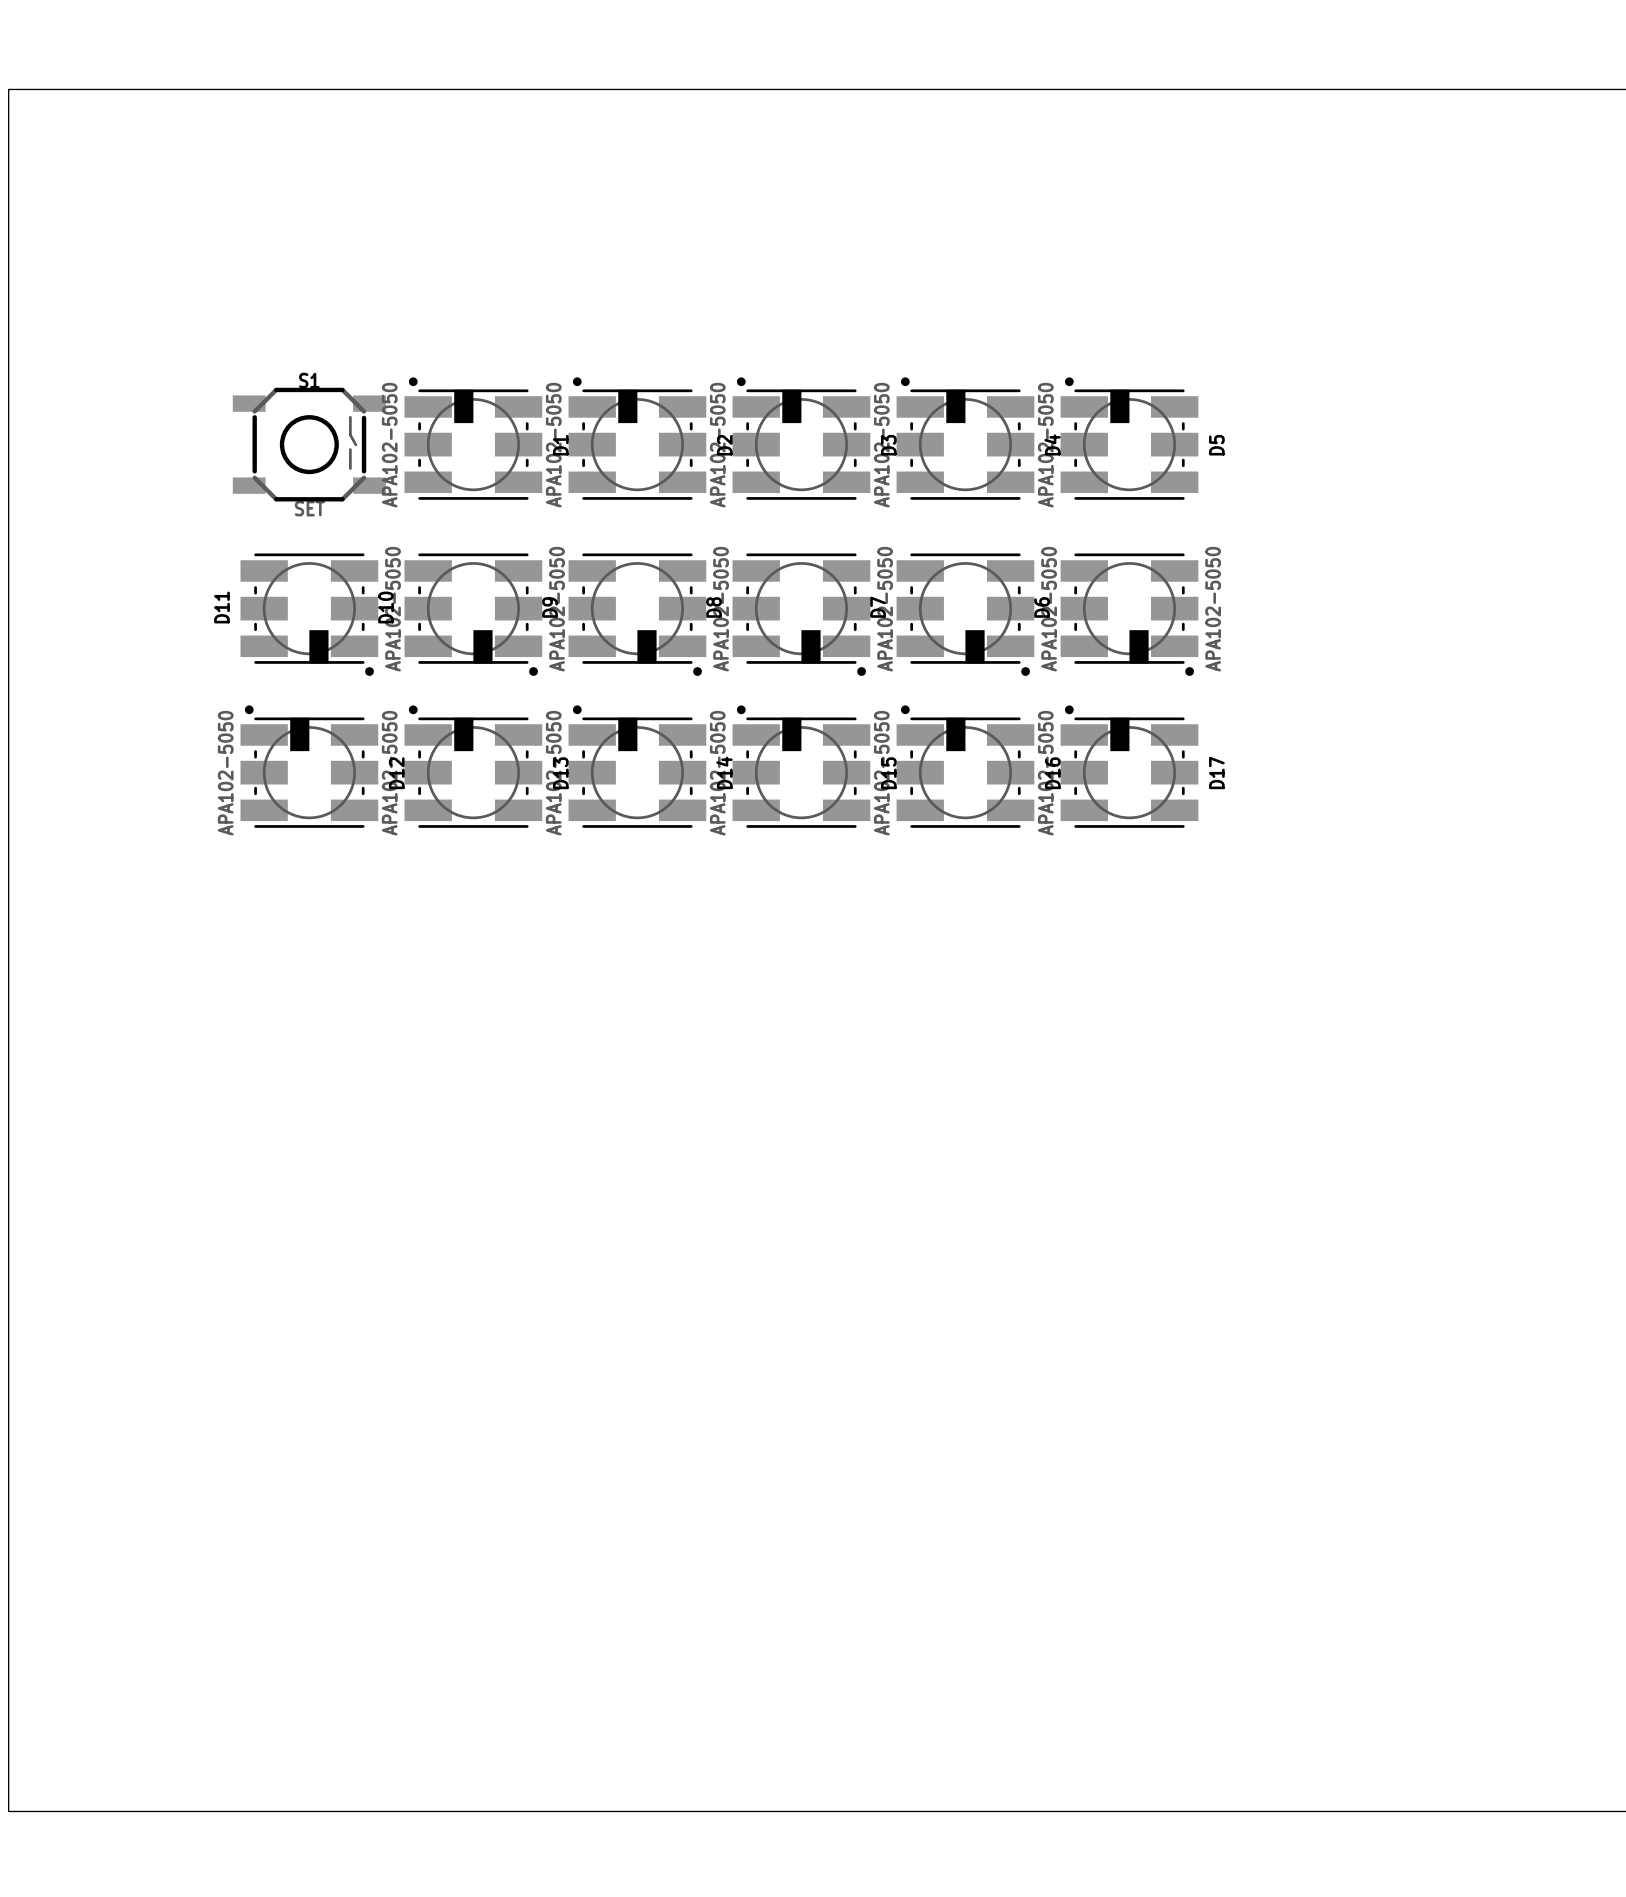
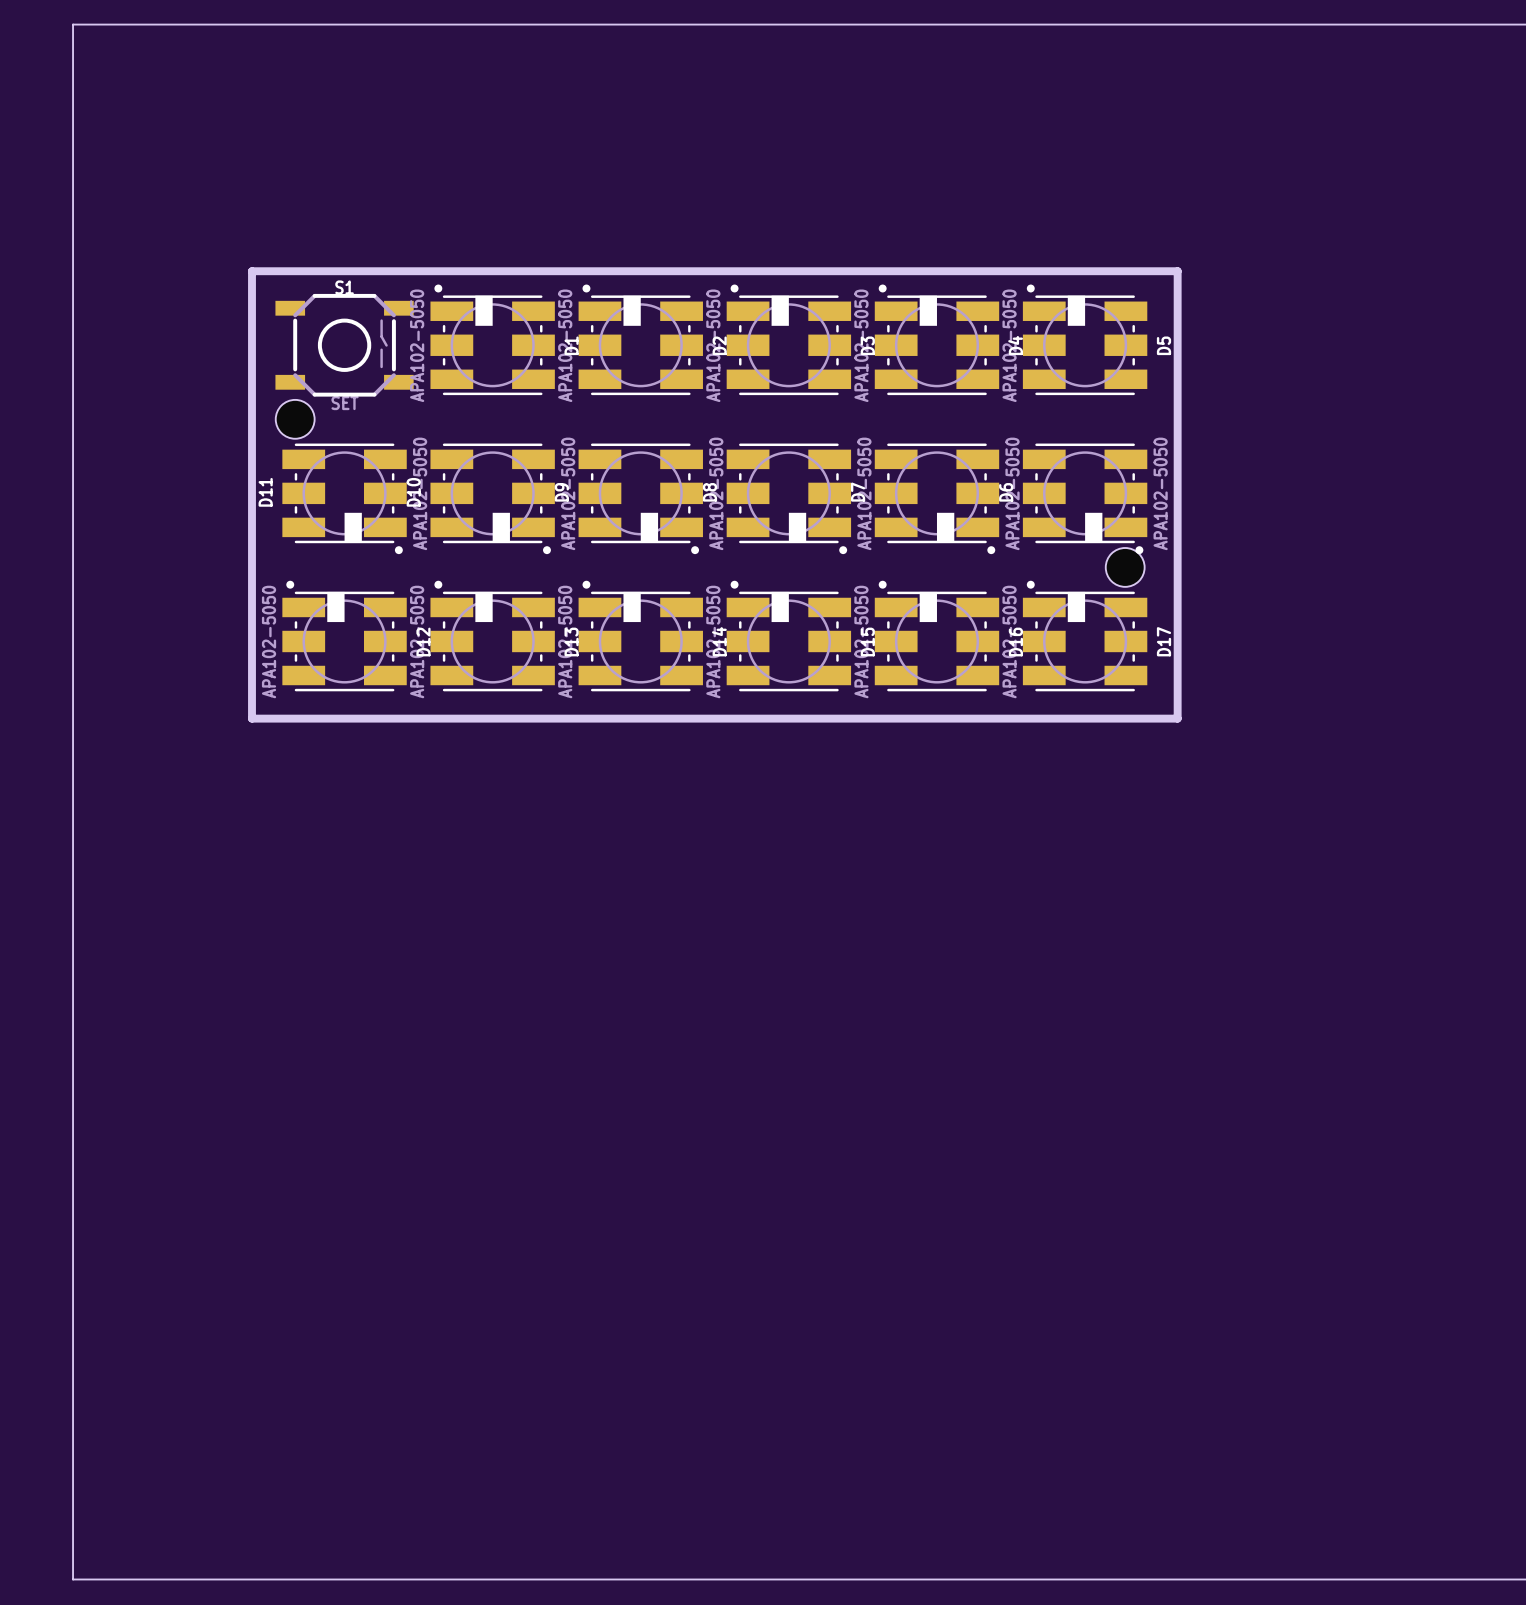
board edge: none -> (251, 271) (251, 718) (1177, 718) (1177, 271) (251, 271)
hole: none -> (295, 419)
hole: none -> (1125, 567)

